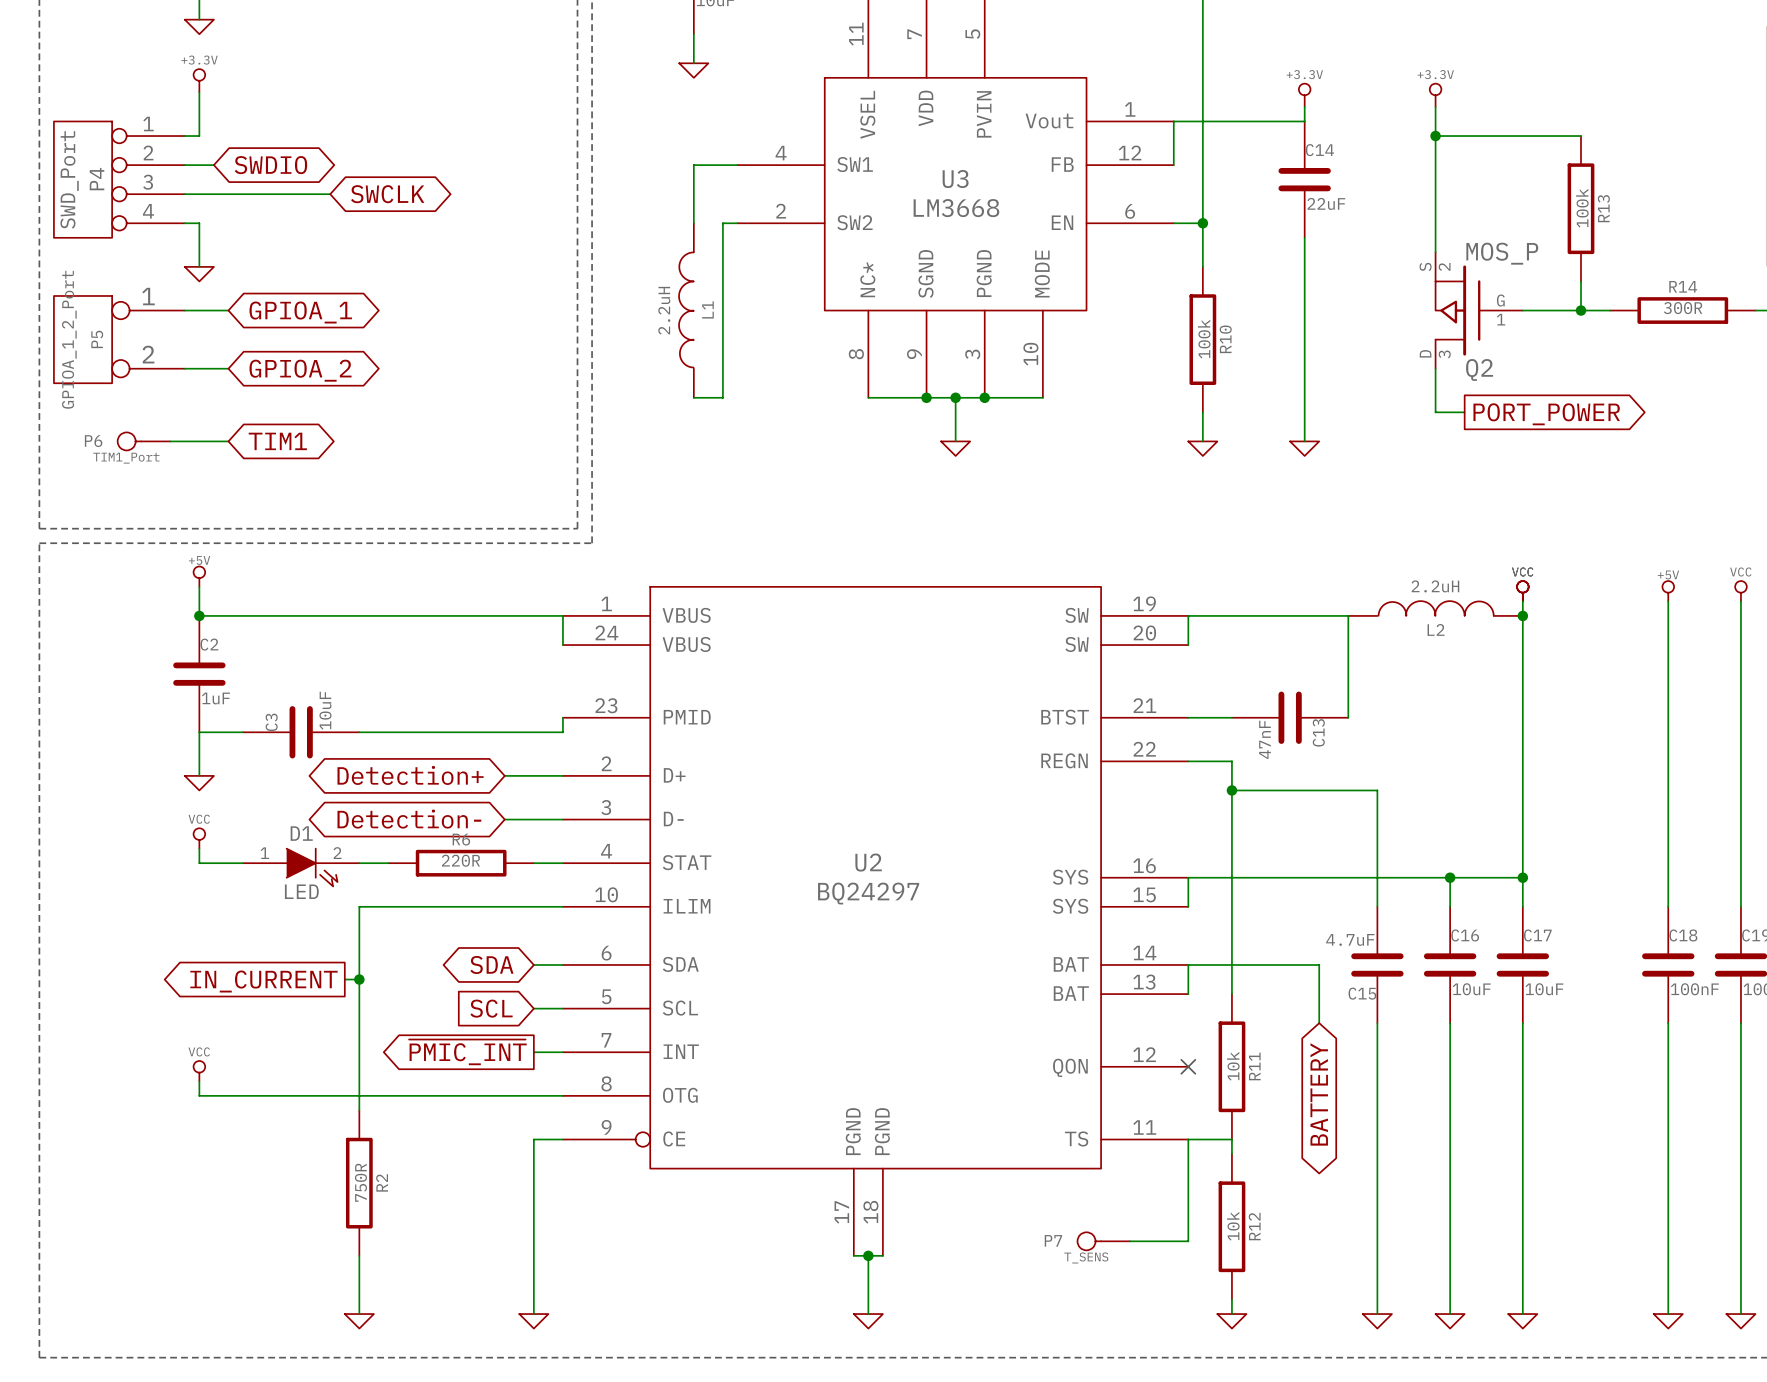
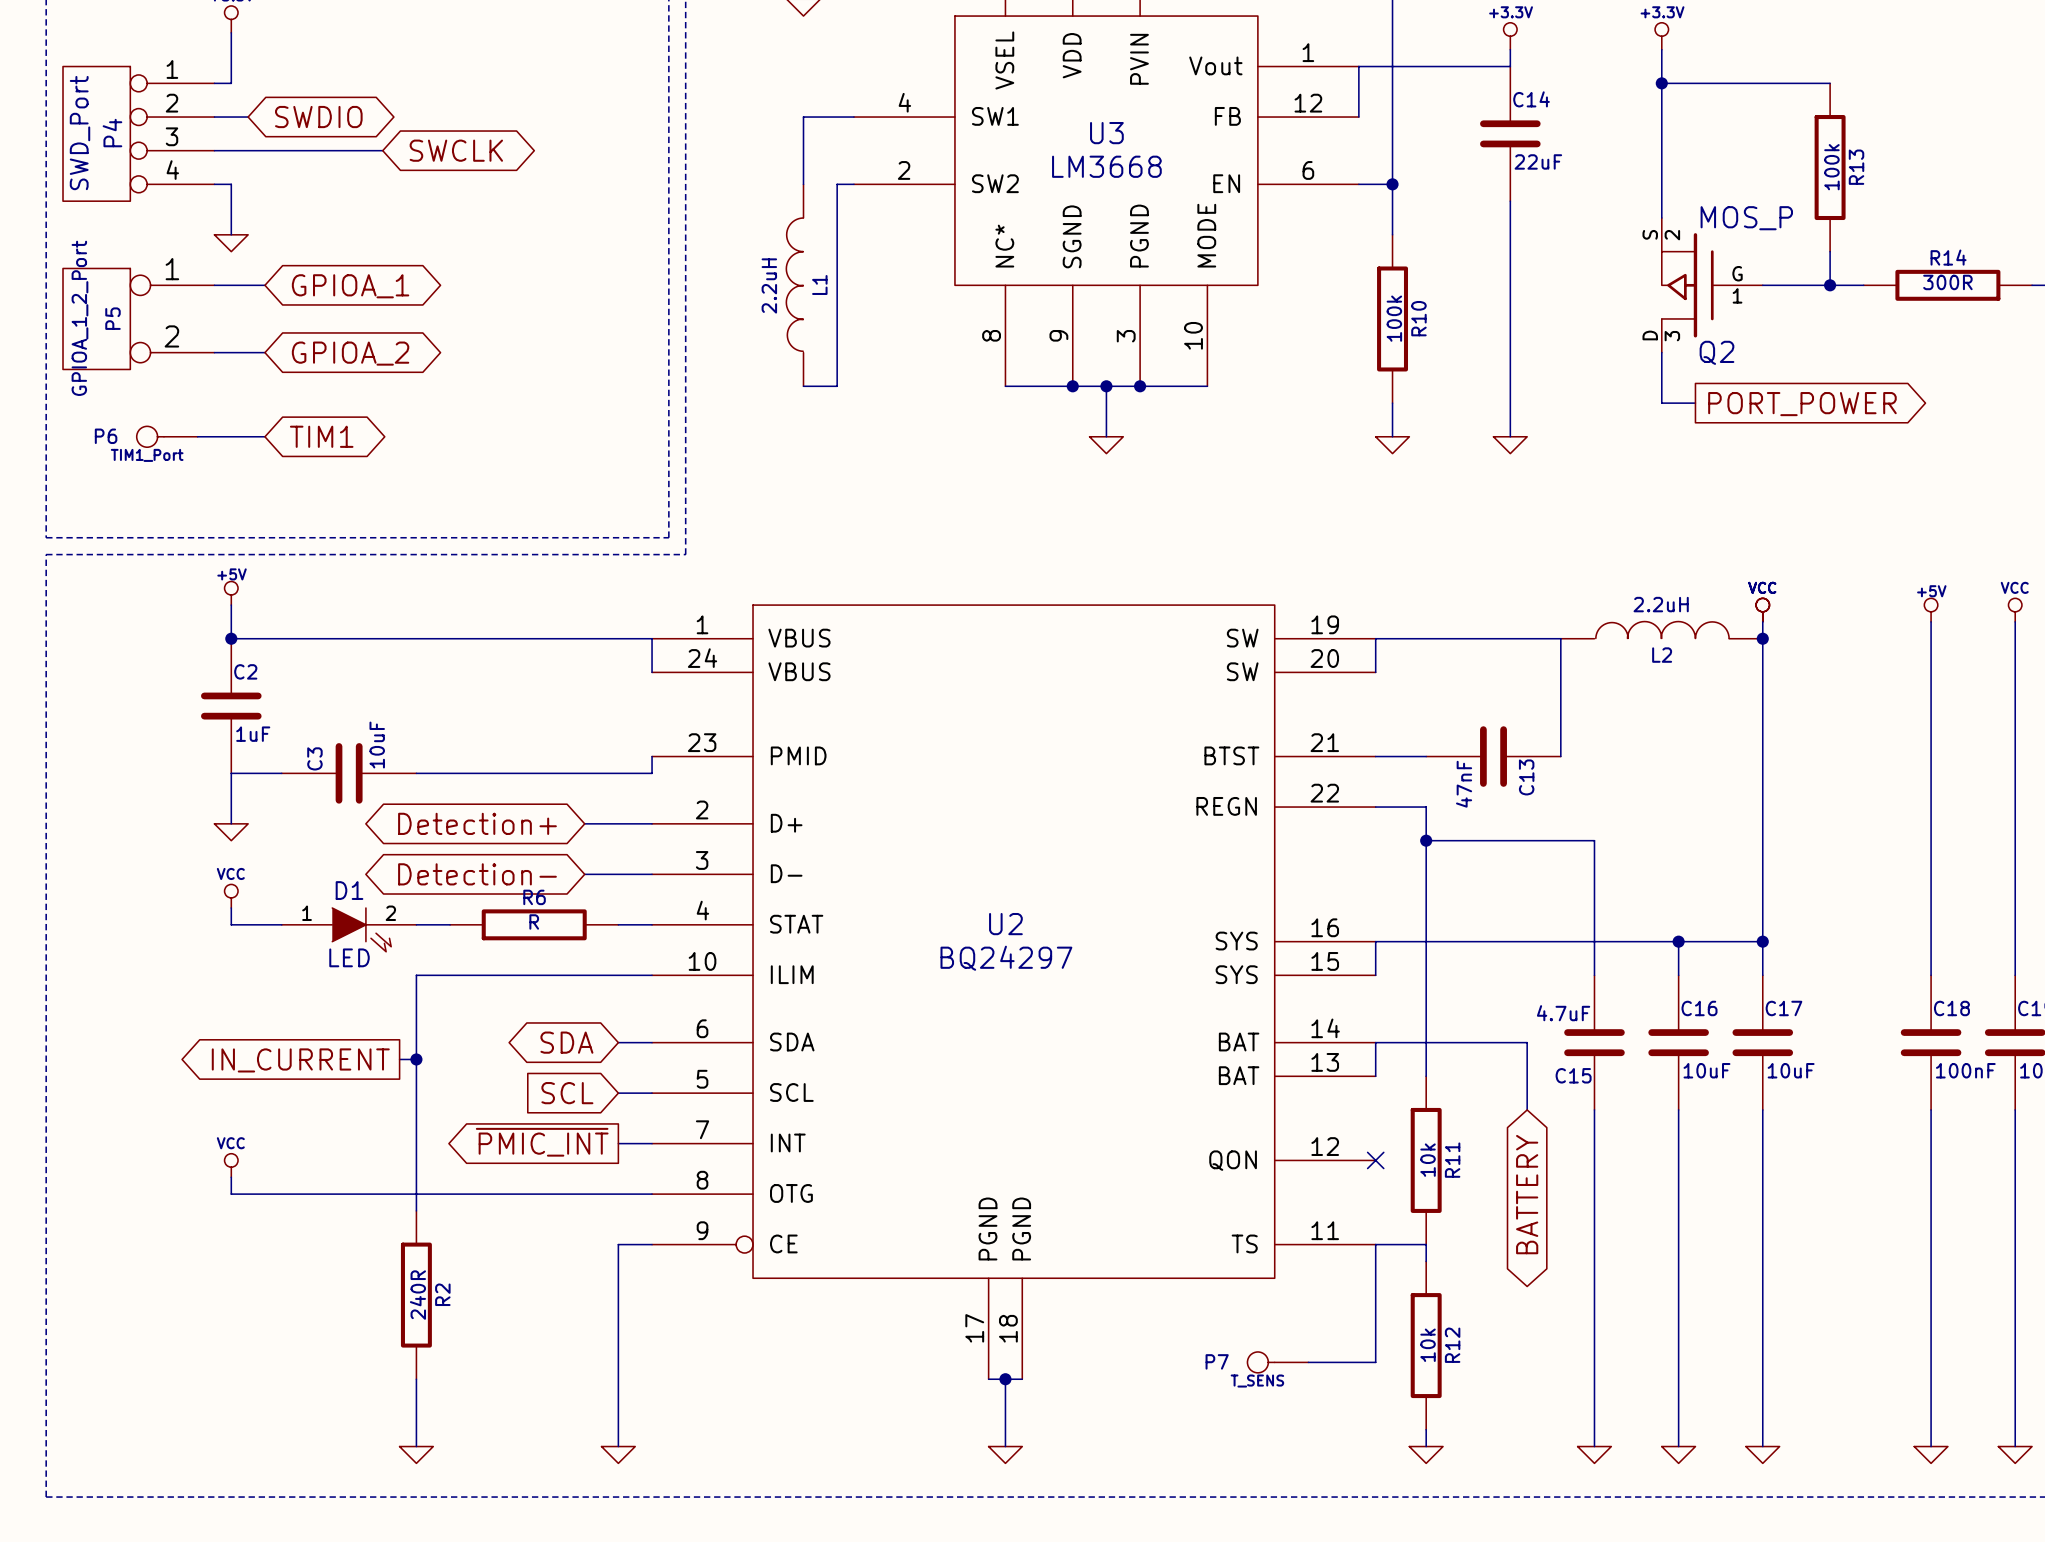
R6 value: 220R (460, 860) -> R (534, 921)
R2 value: 750R (360, 1182) -> 240R (417, 1295)

